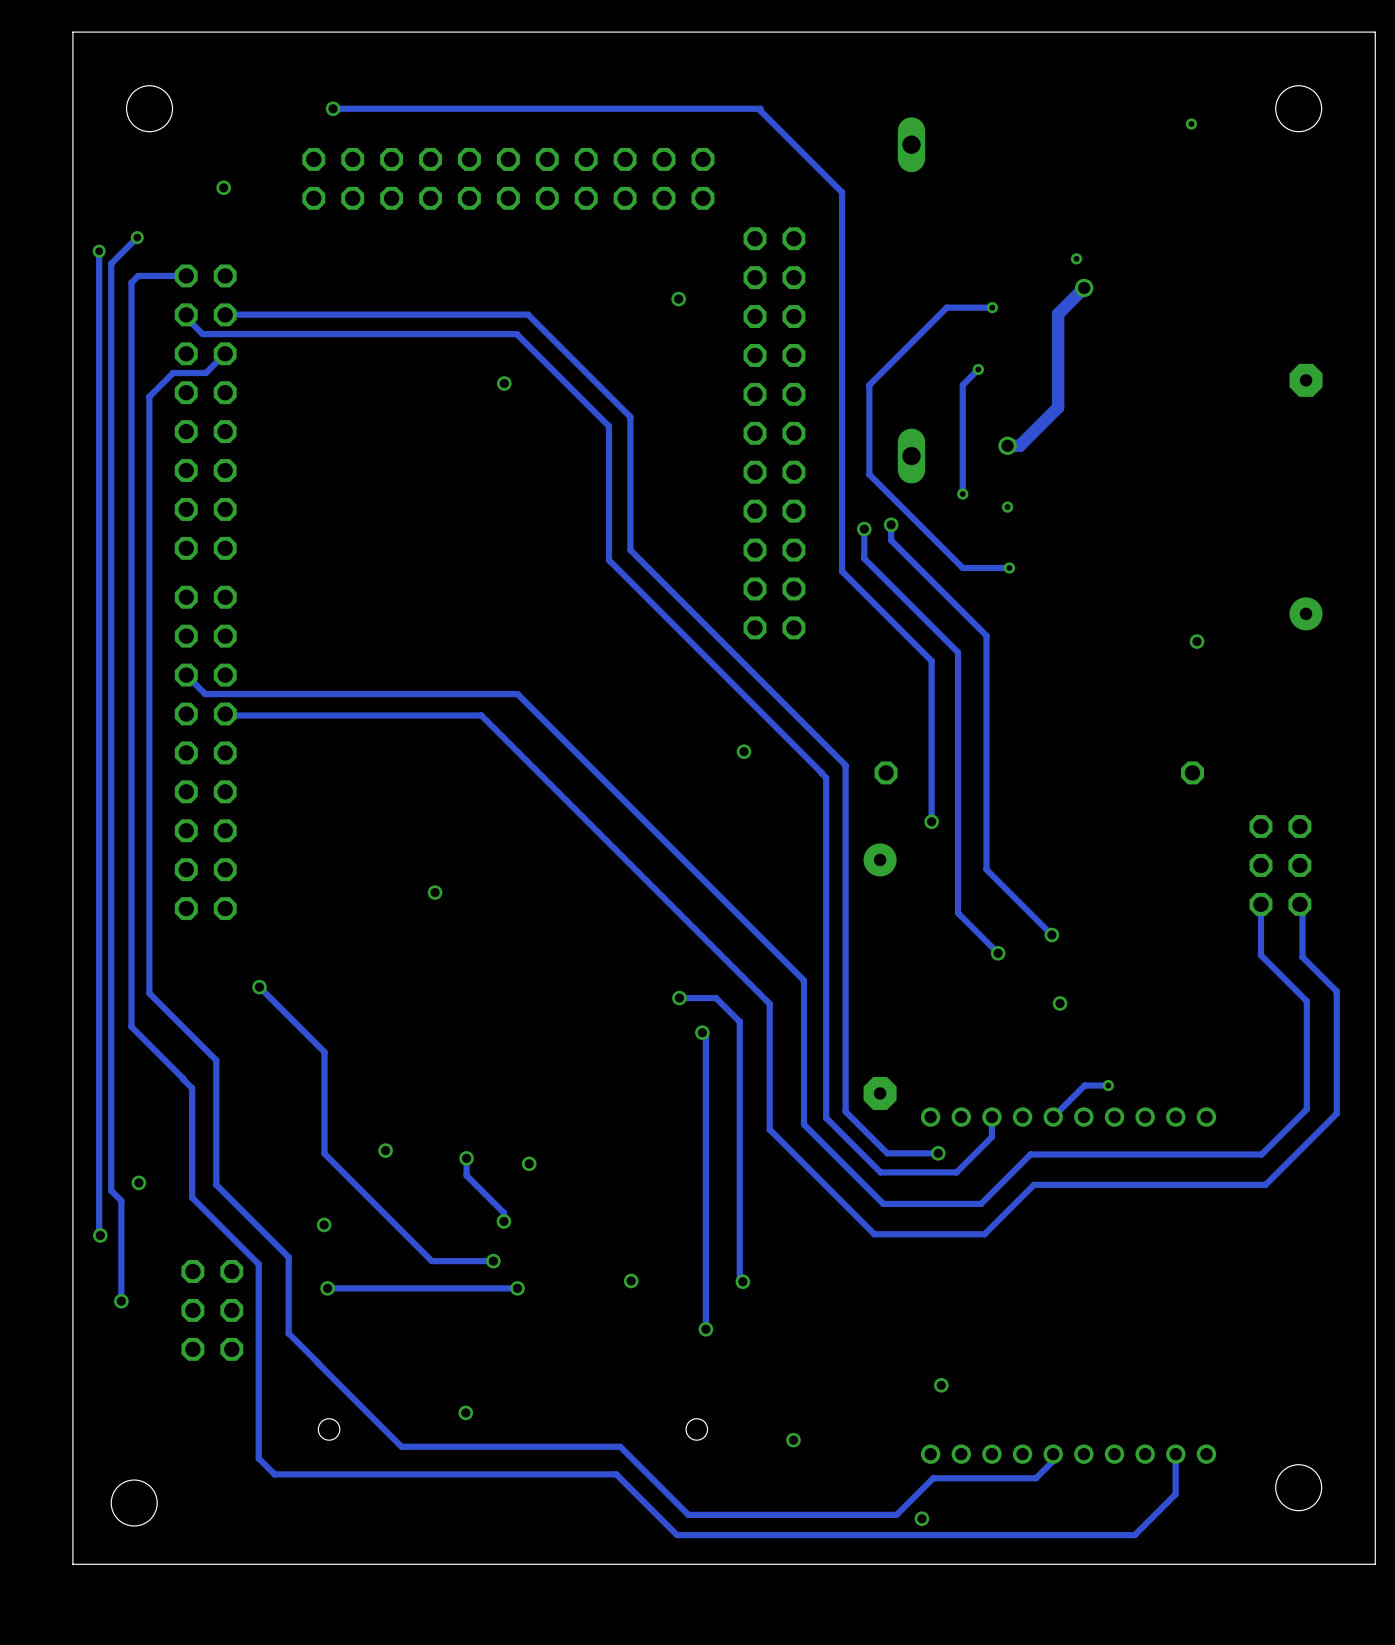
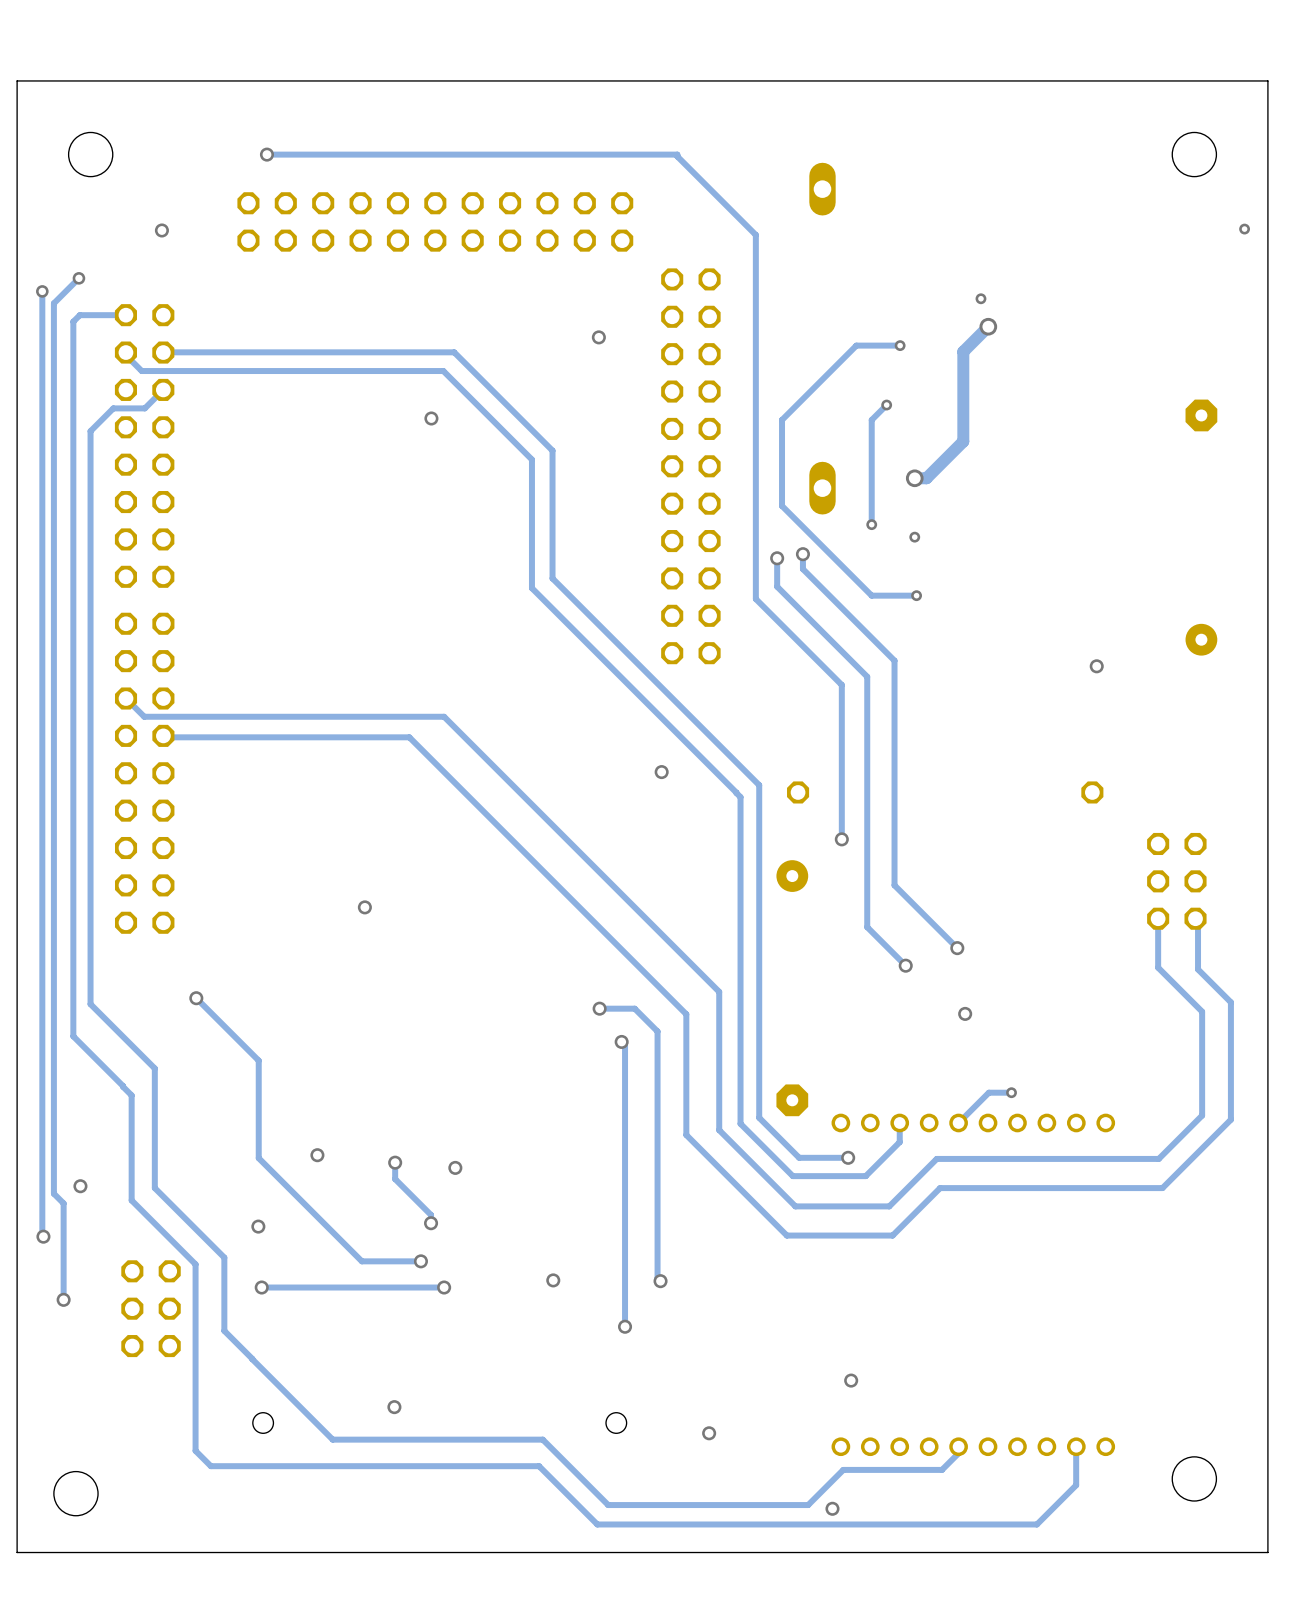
via: (1191, 124) -> none
via: none -> (1244, 229)

